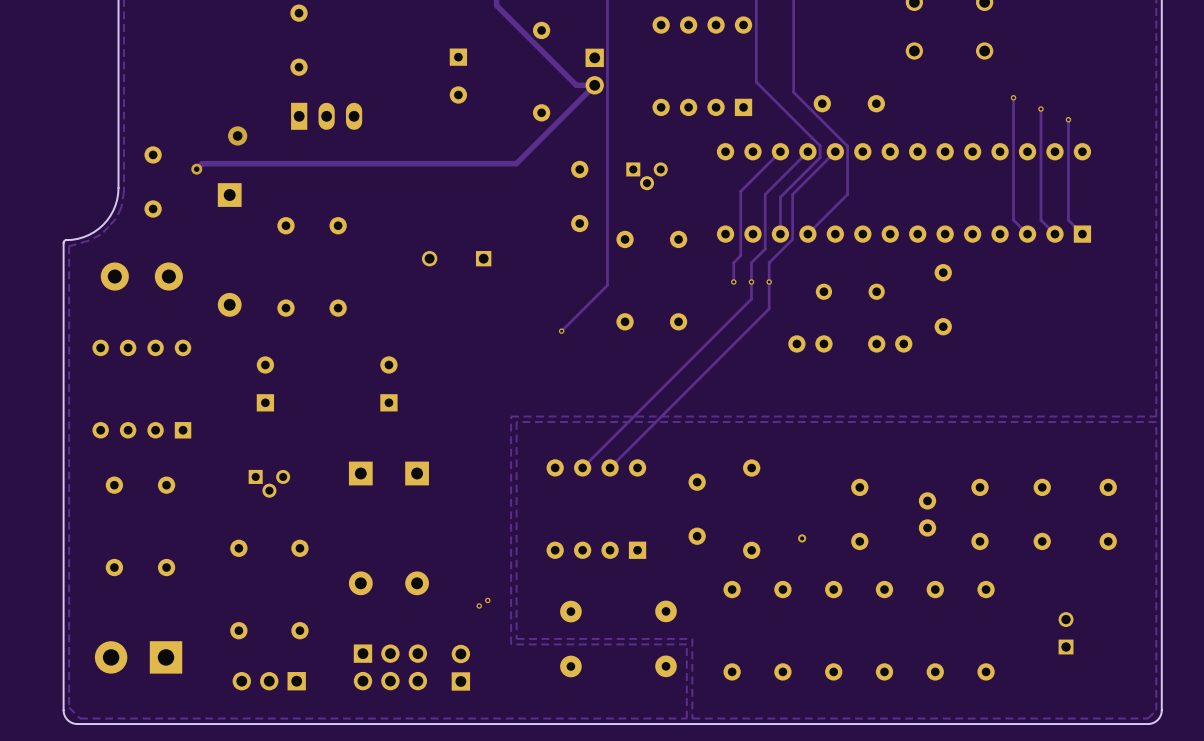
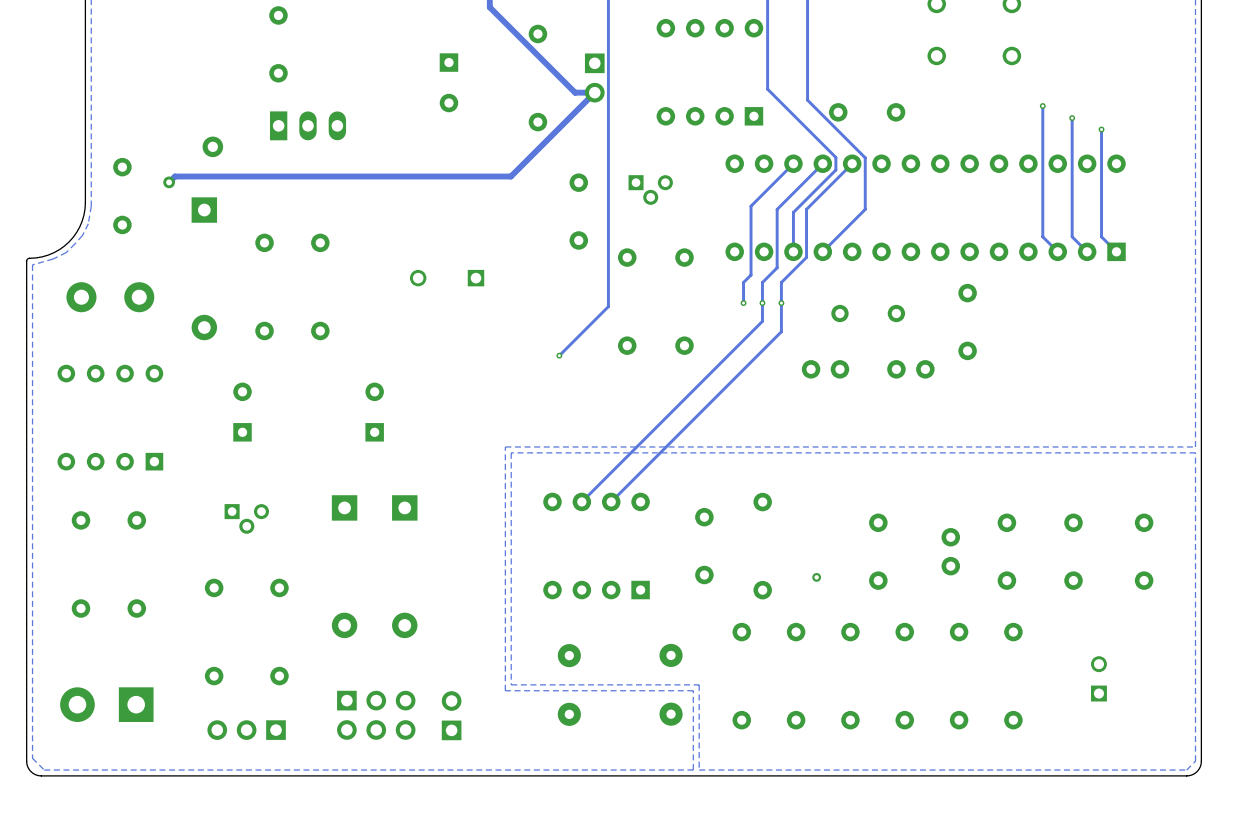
via: (487, 600) -> none
via: (479, 605) -> none

